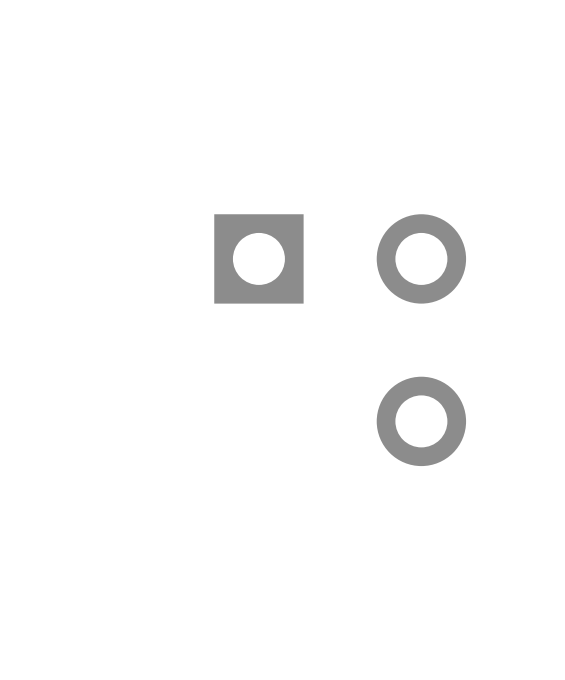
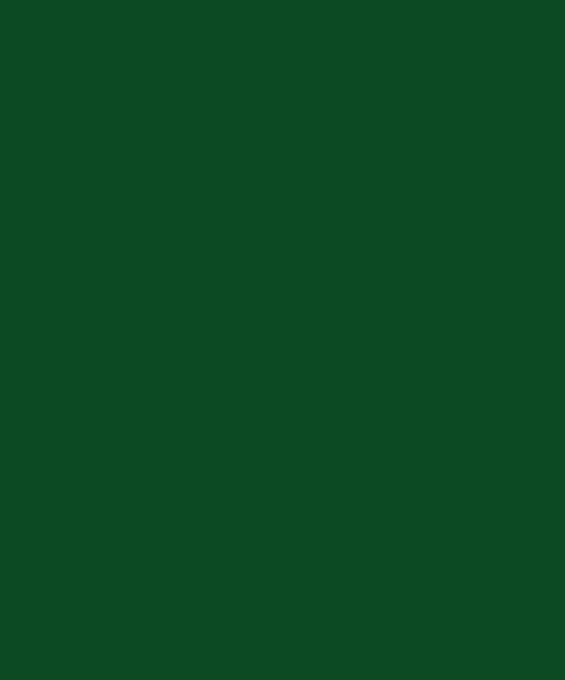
part: (340, 340) -> none

